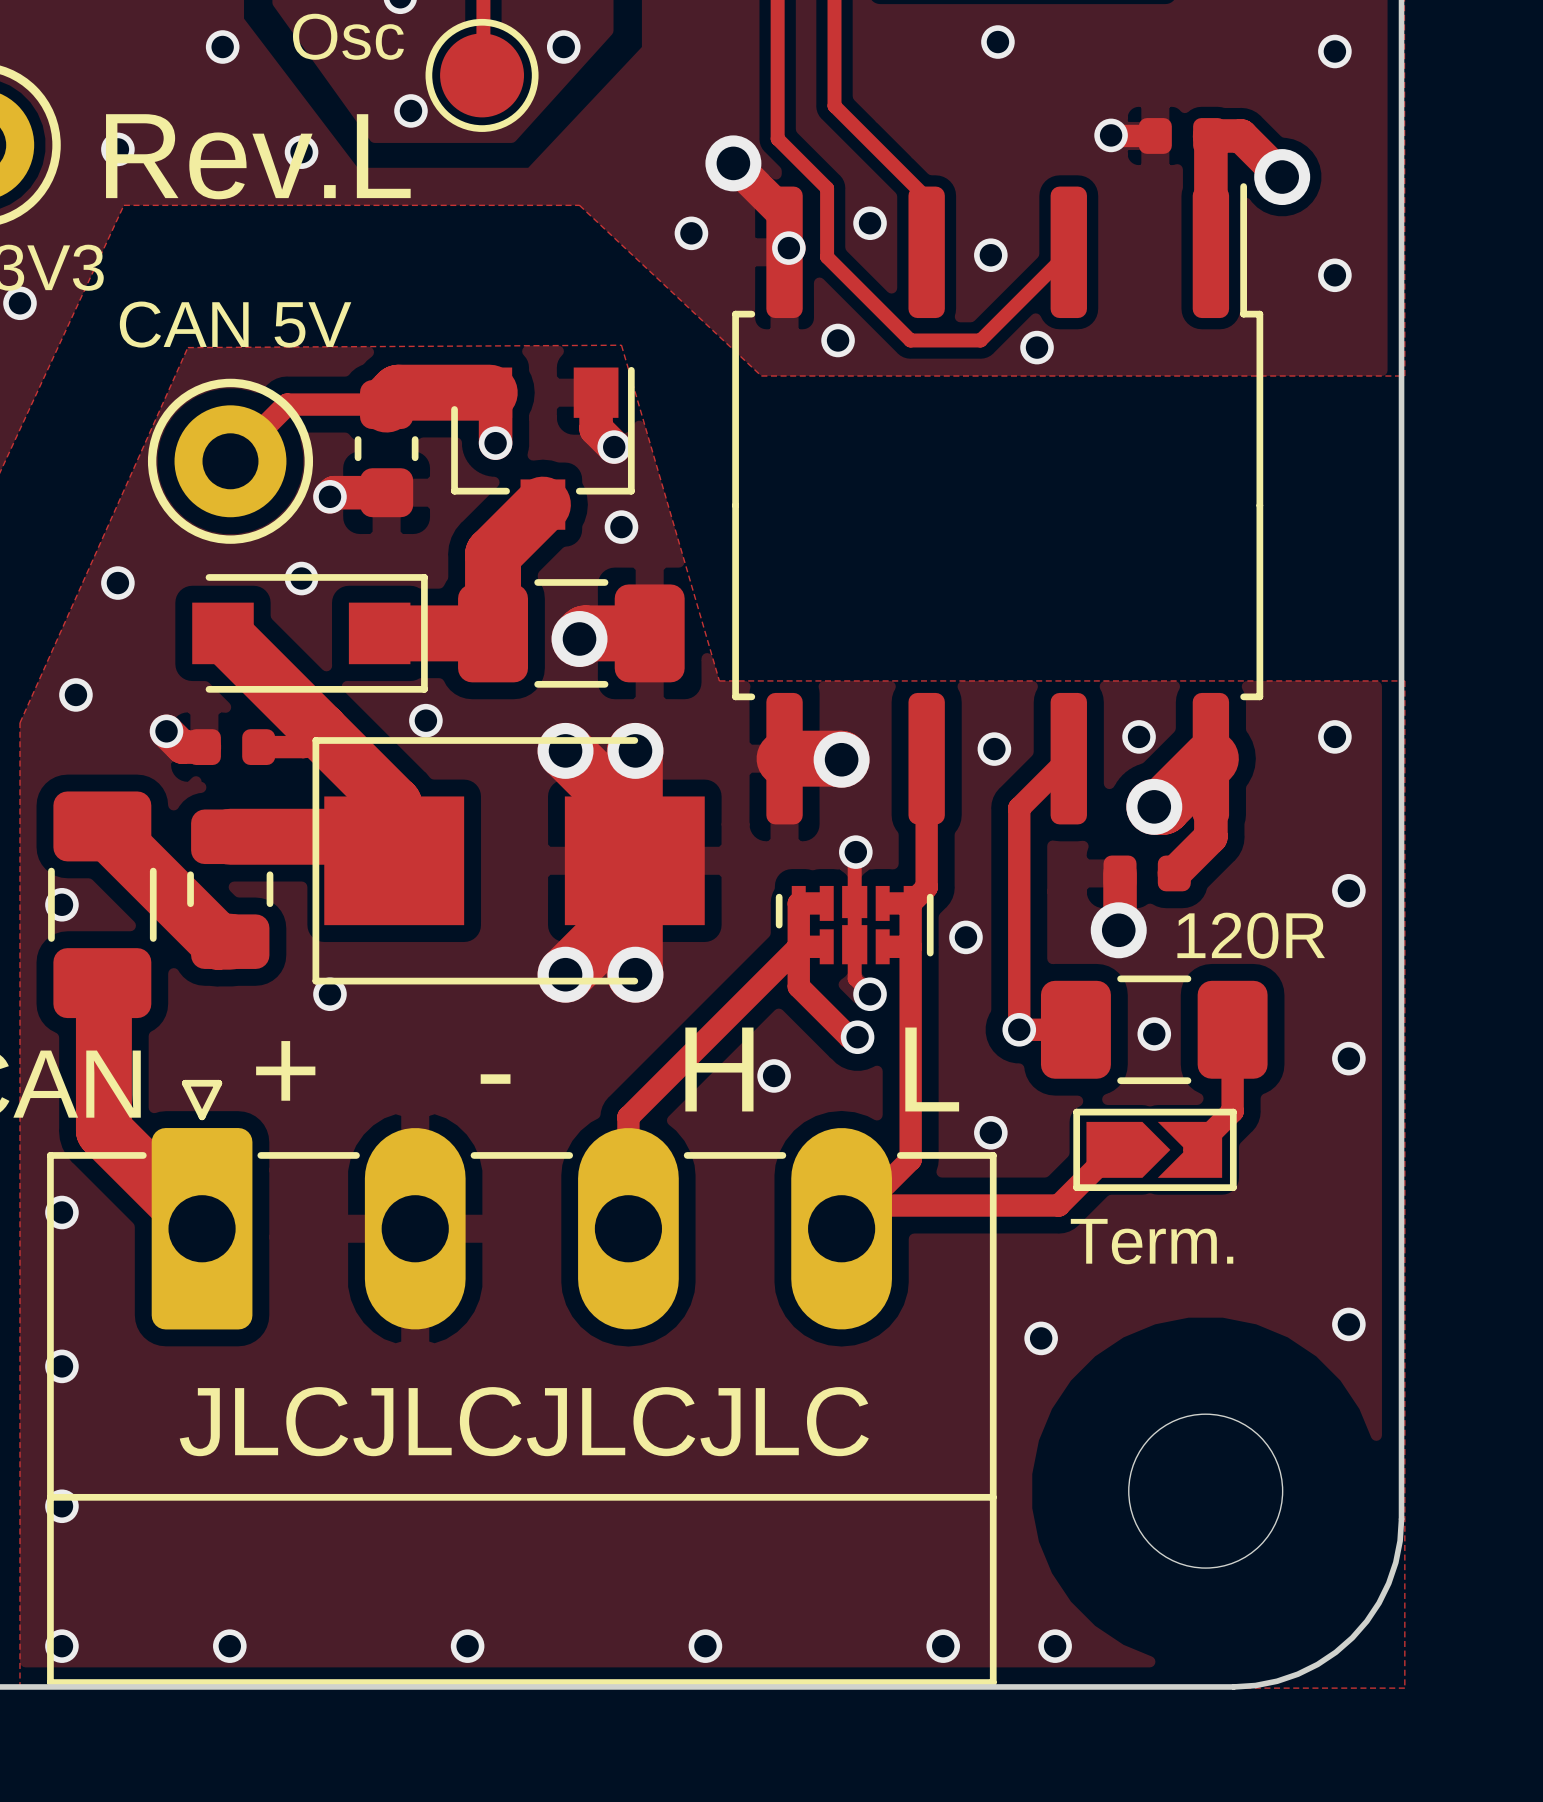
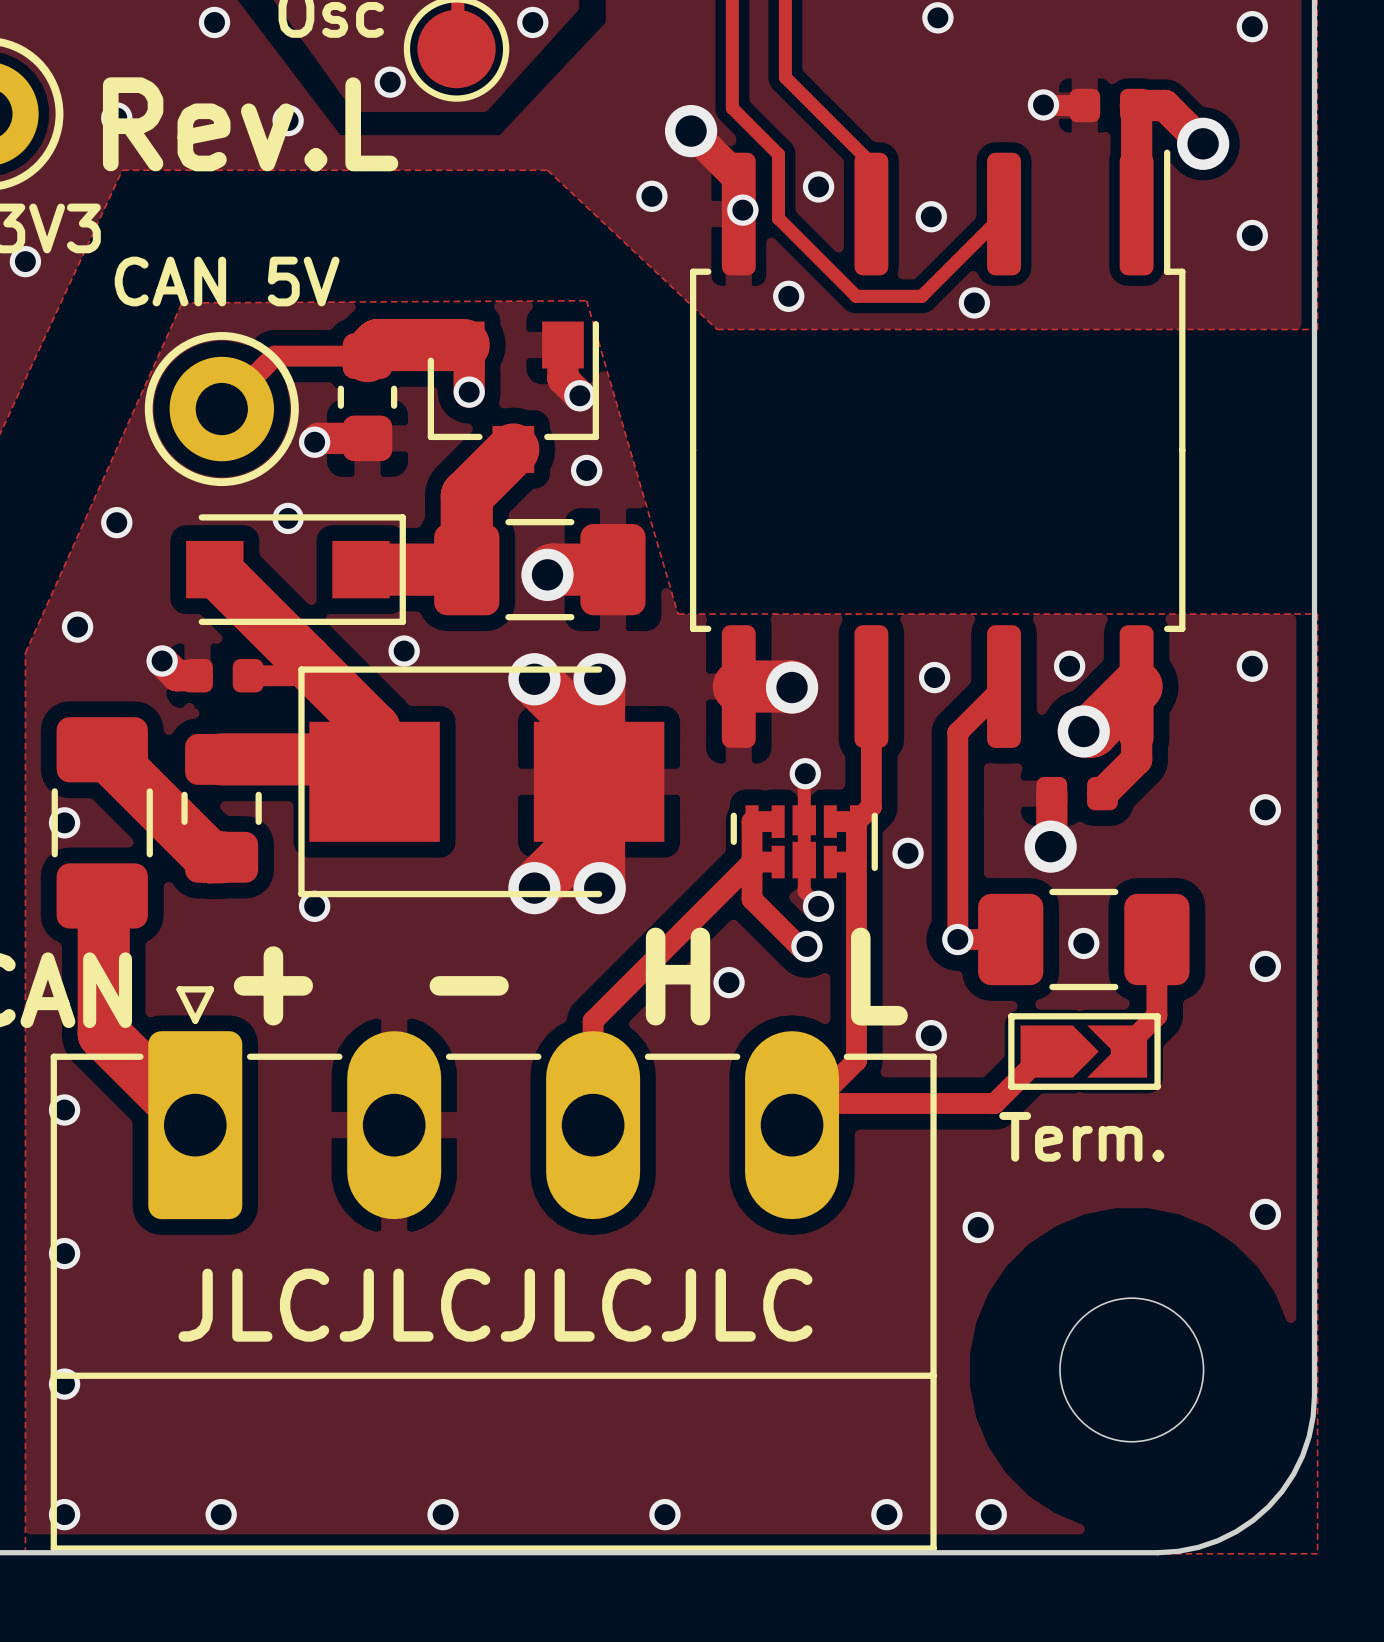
text: 120R (1251, 935) -> none

